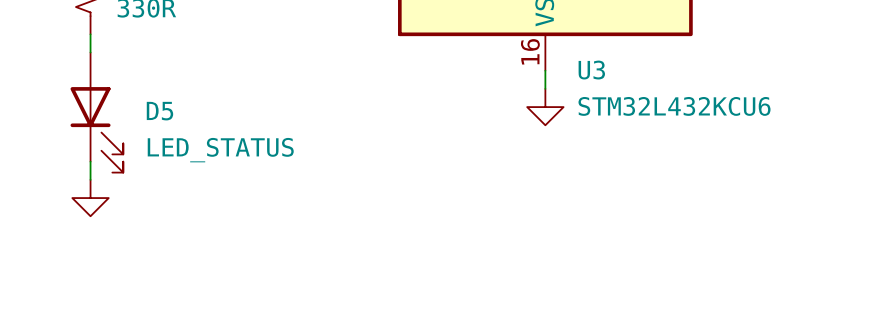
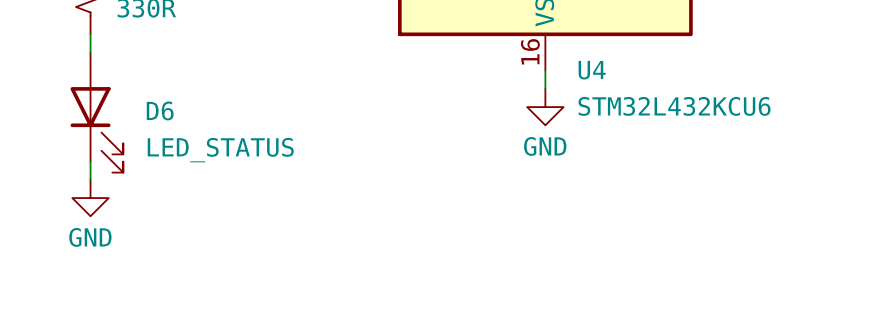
U3 name: U3 (591, 70) -> U4 (592, 70)
D5 name: D5 (159, 111) -> D6 (160, 110)
power symbol text: none -> GND (545, 146)
power symbol text: none -> GND (90, 237)

